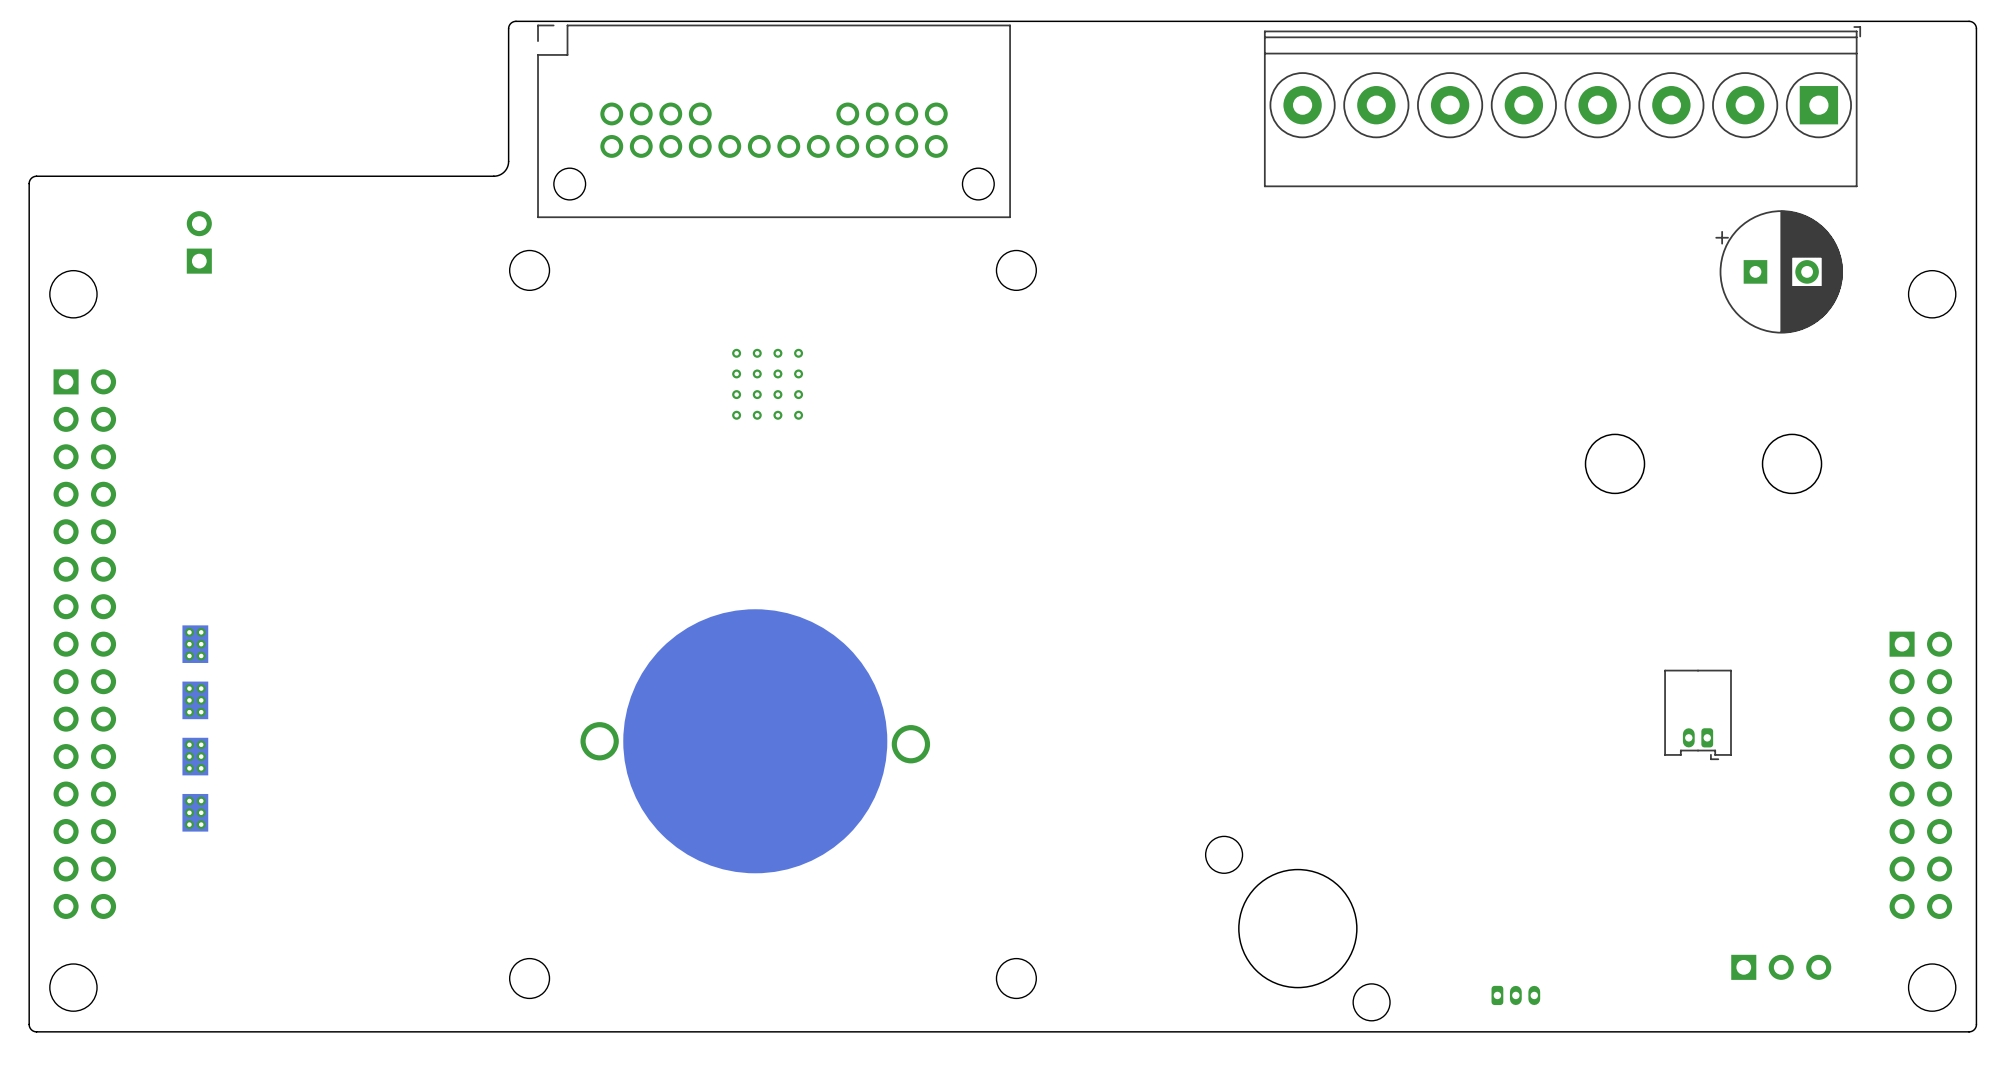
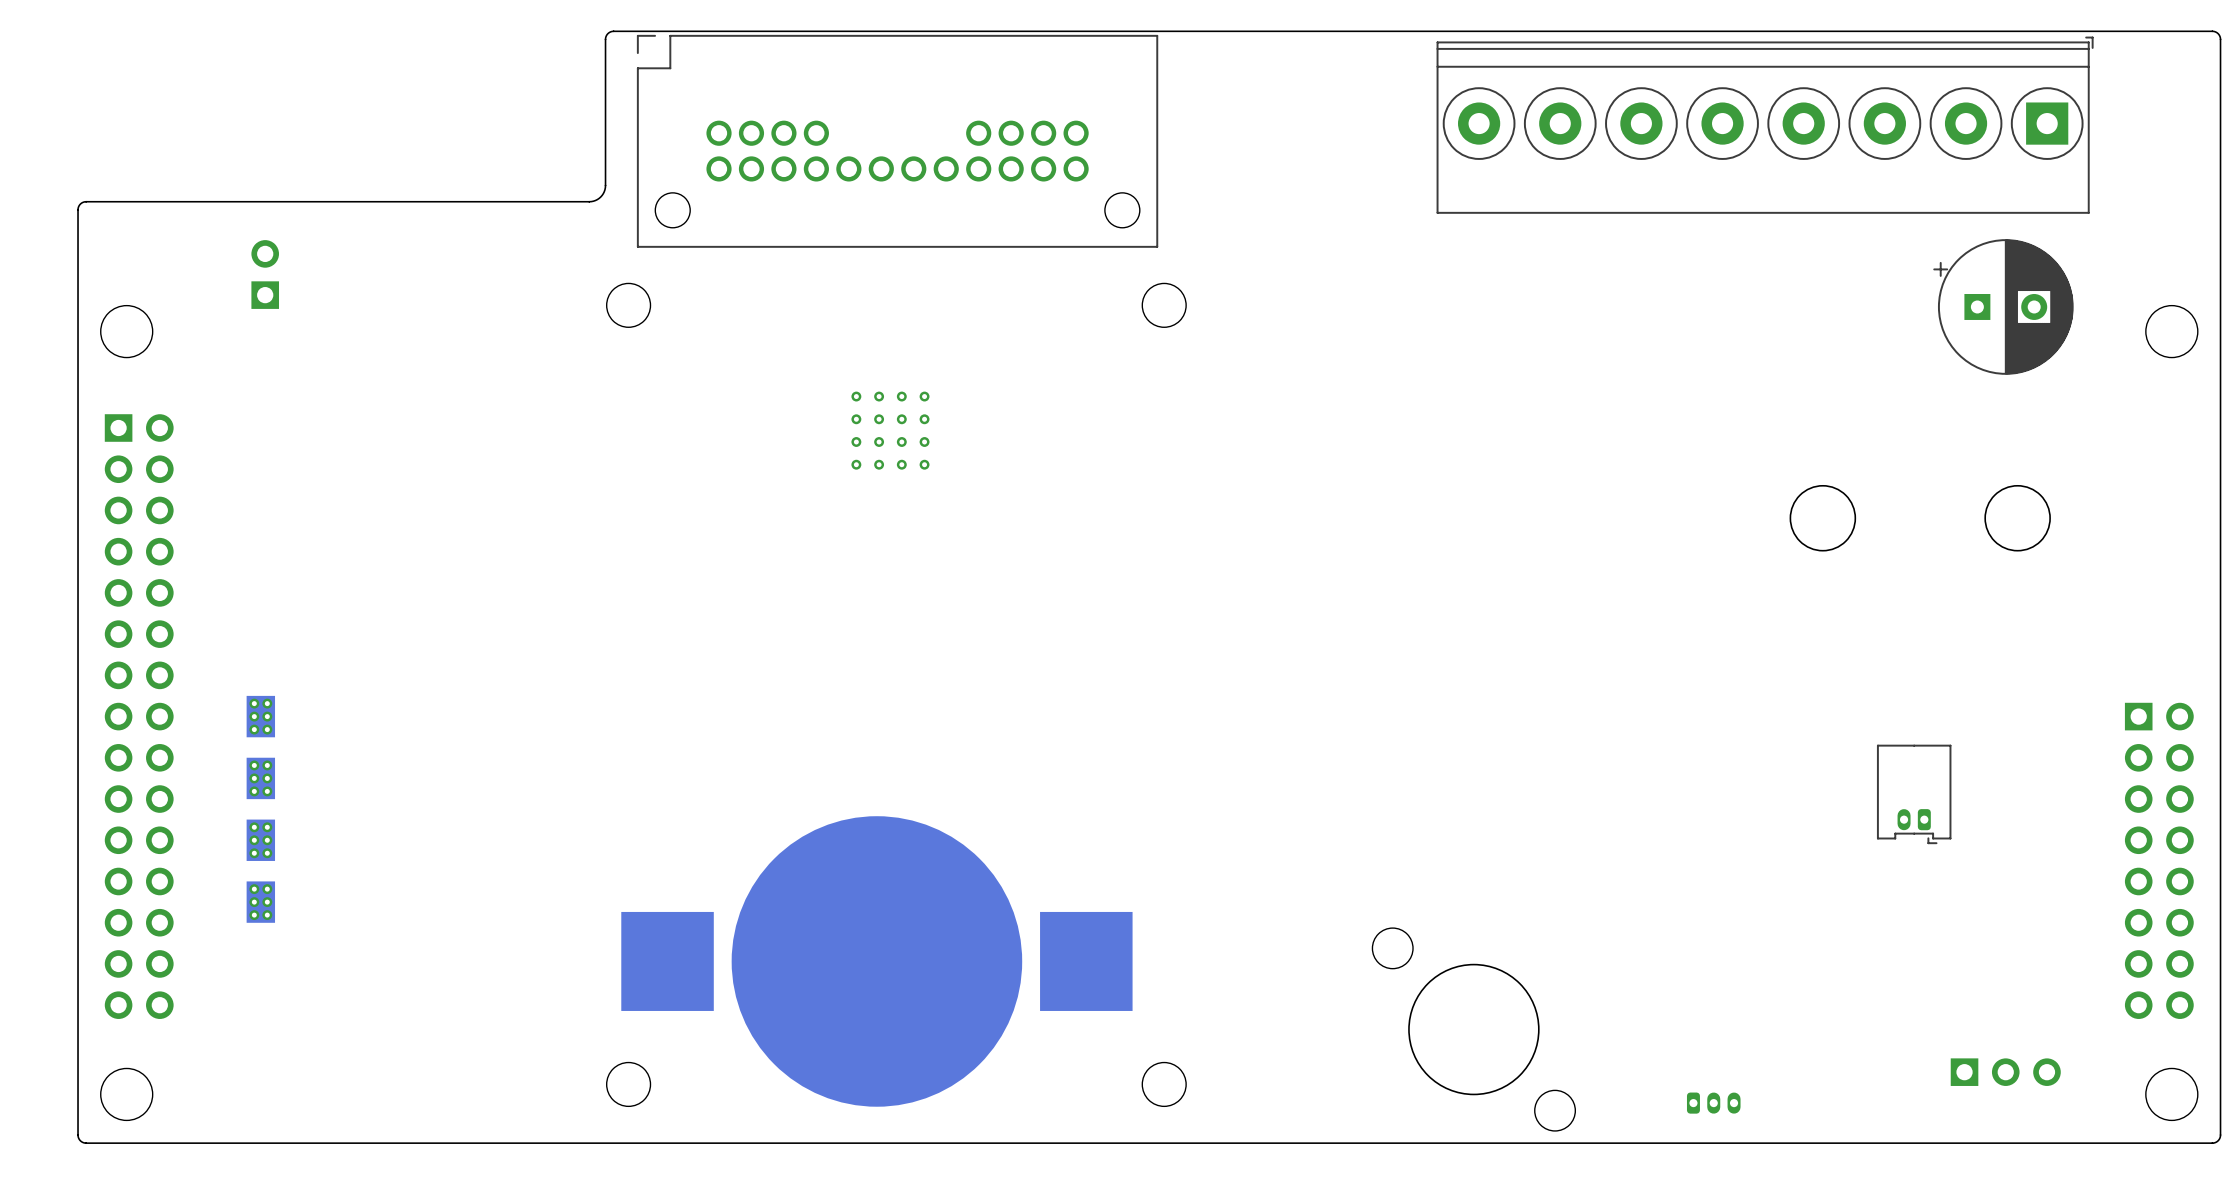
part: (755, 741) -> none
part: none -> (876, 961)

